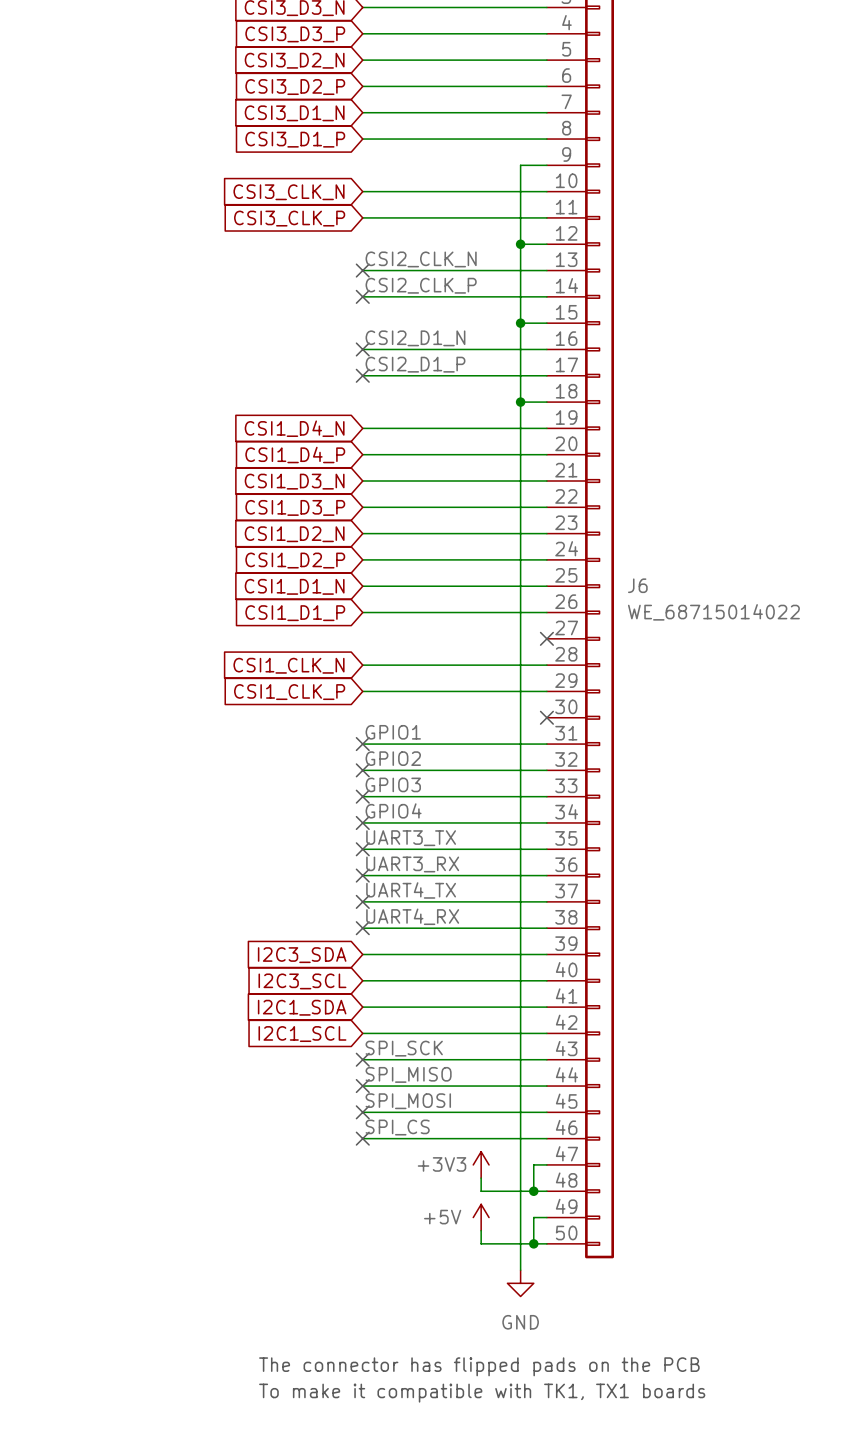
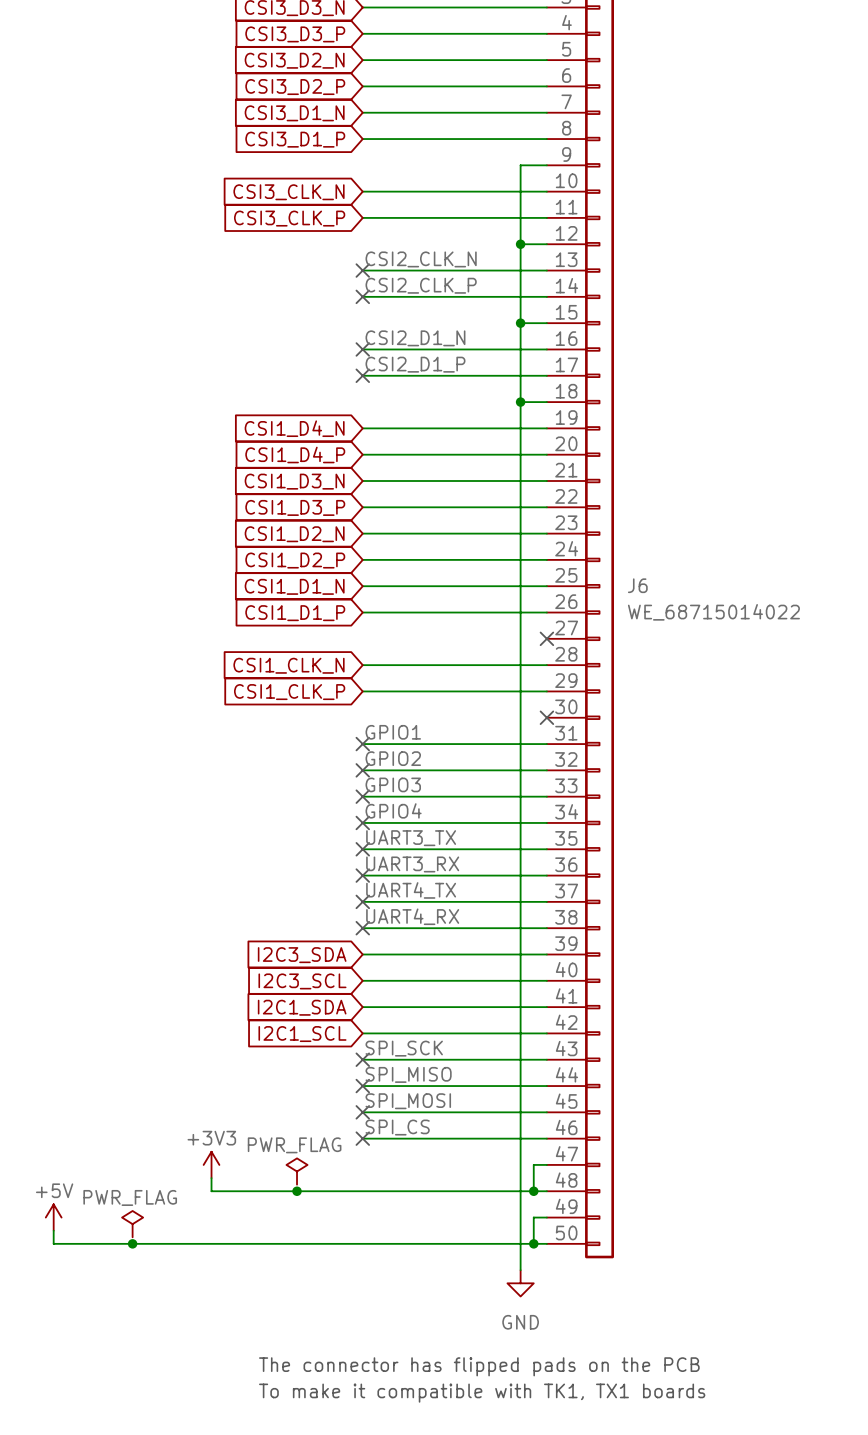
power symbol: none -> +3V3 (211, 1164)
power symbol: +3V3 (481, 1164) -> none
power symbol: none -> PWR_FLAG (297, 1171)
wire: (481, 1178) (481, 1191) -> (211, 1178) (211, 1191) (481, 1191)
junction: none -> (297, 1191)
power symbol: none -> +5V (53, 1217)
power symbol: +5V (481, 1217) -> none
power symbol: none -> PWR_FLAG (132, 1224)
wire: (481, 1230) (481, 1243) -> (53, 1230) (53, 1243) (481, 1243)
junction: none -> (132, 1243)

